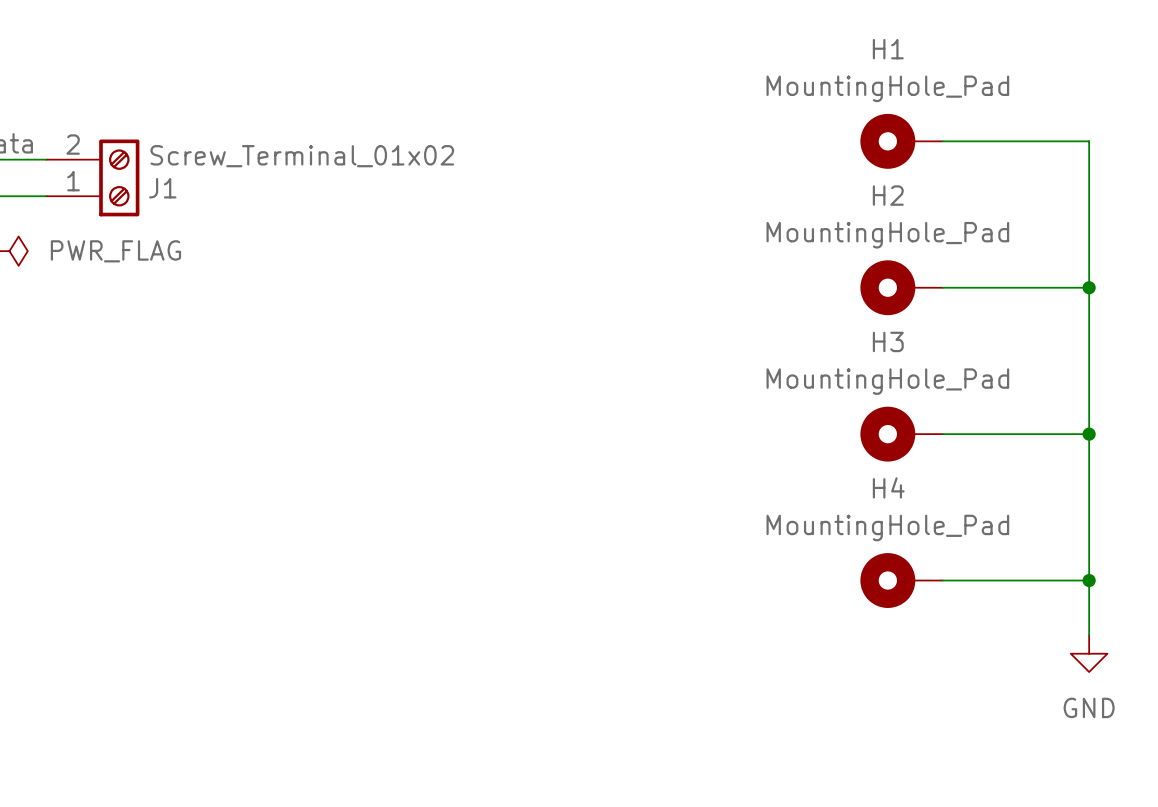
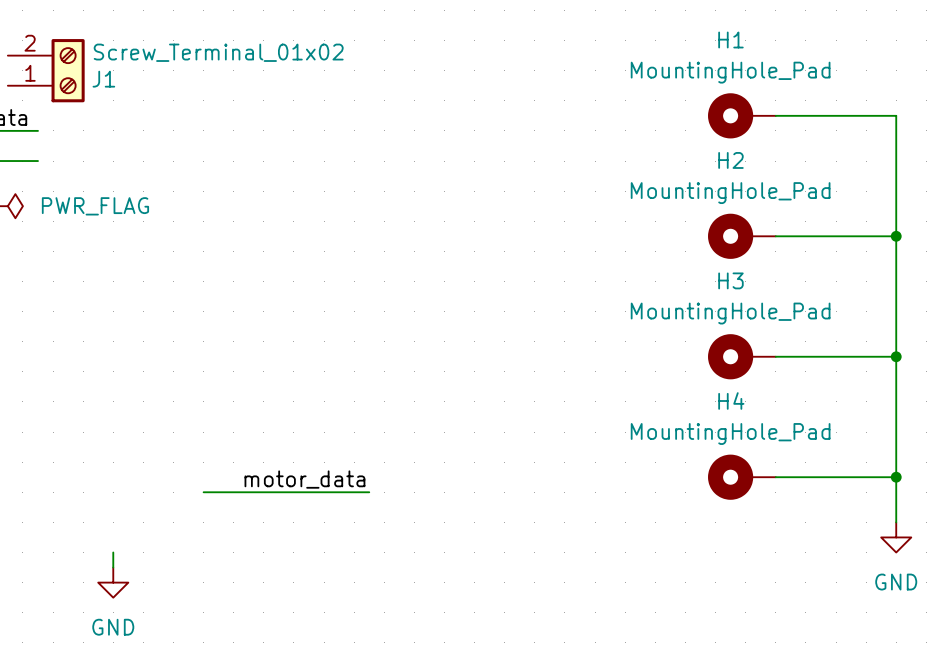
J1 position: (92, 177) -> (46, 70)
label: none -> motor_data (304, 479)
wire: none -> (203, 492) (369, 492)
wire: none -> (113, 552) (113, 567)
power symbol: none -> GND (113, 582)

